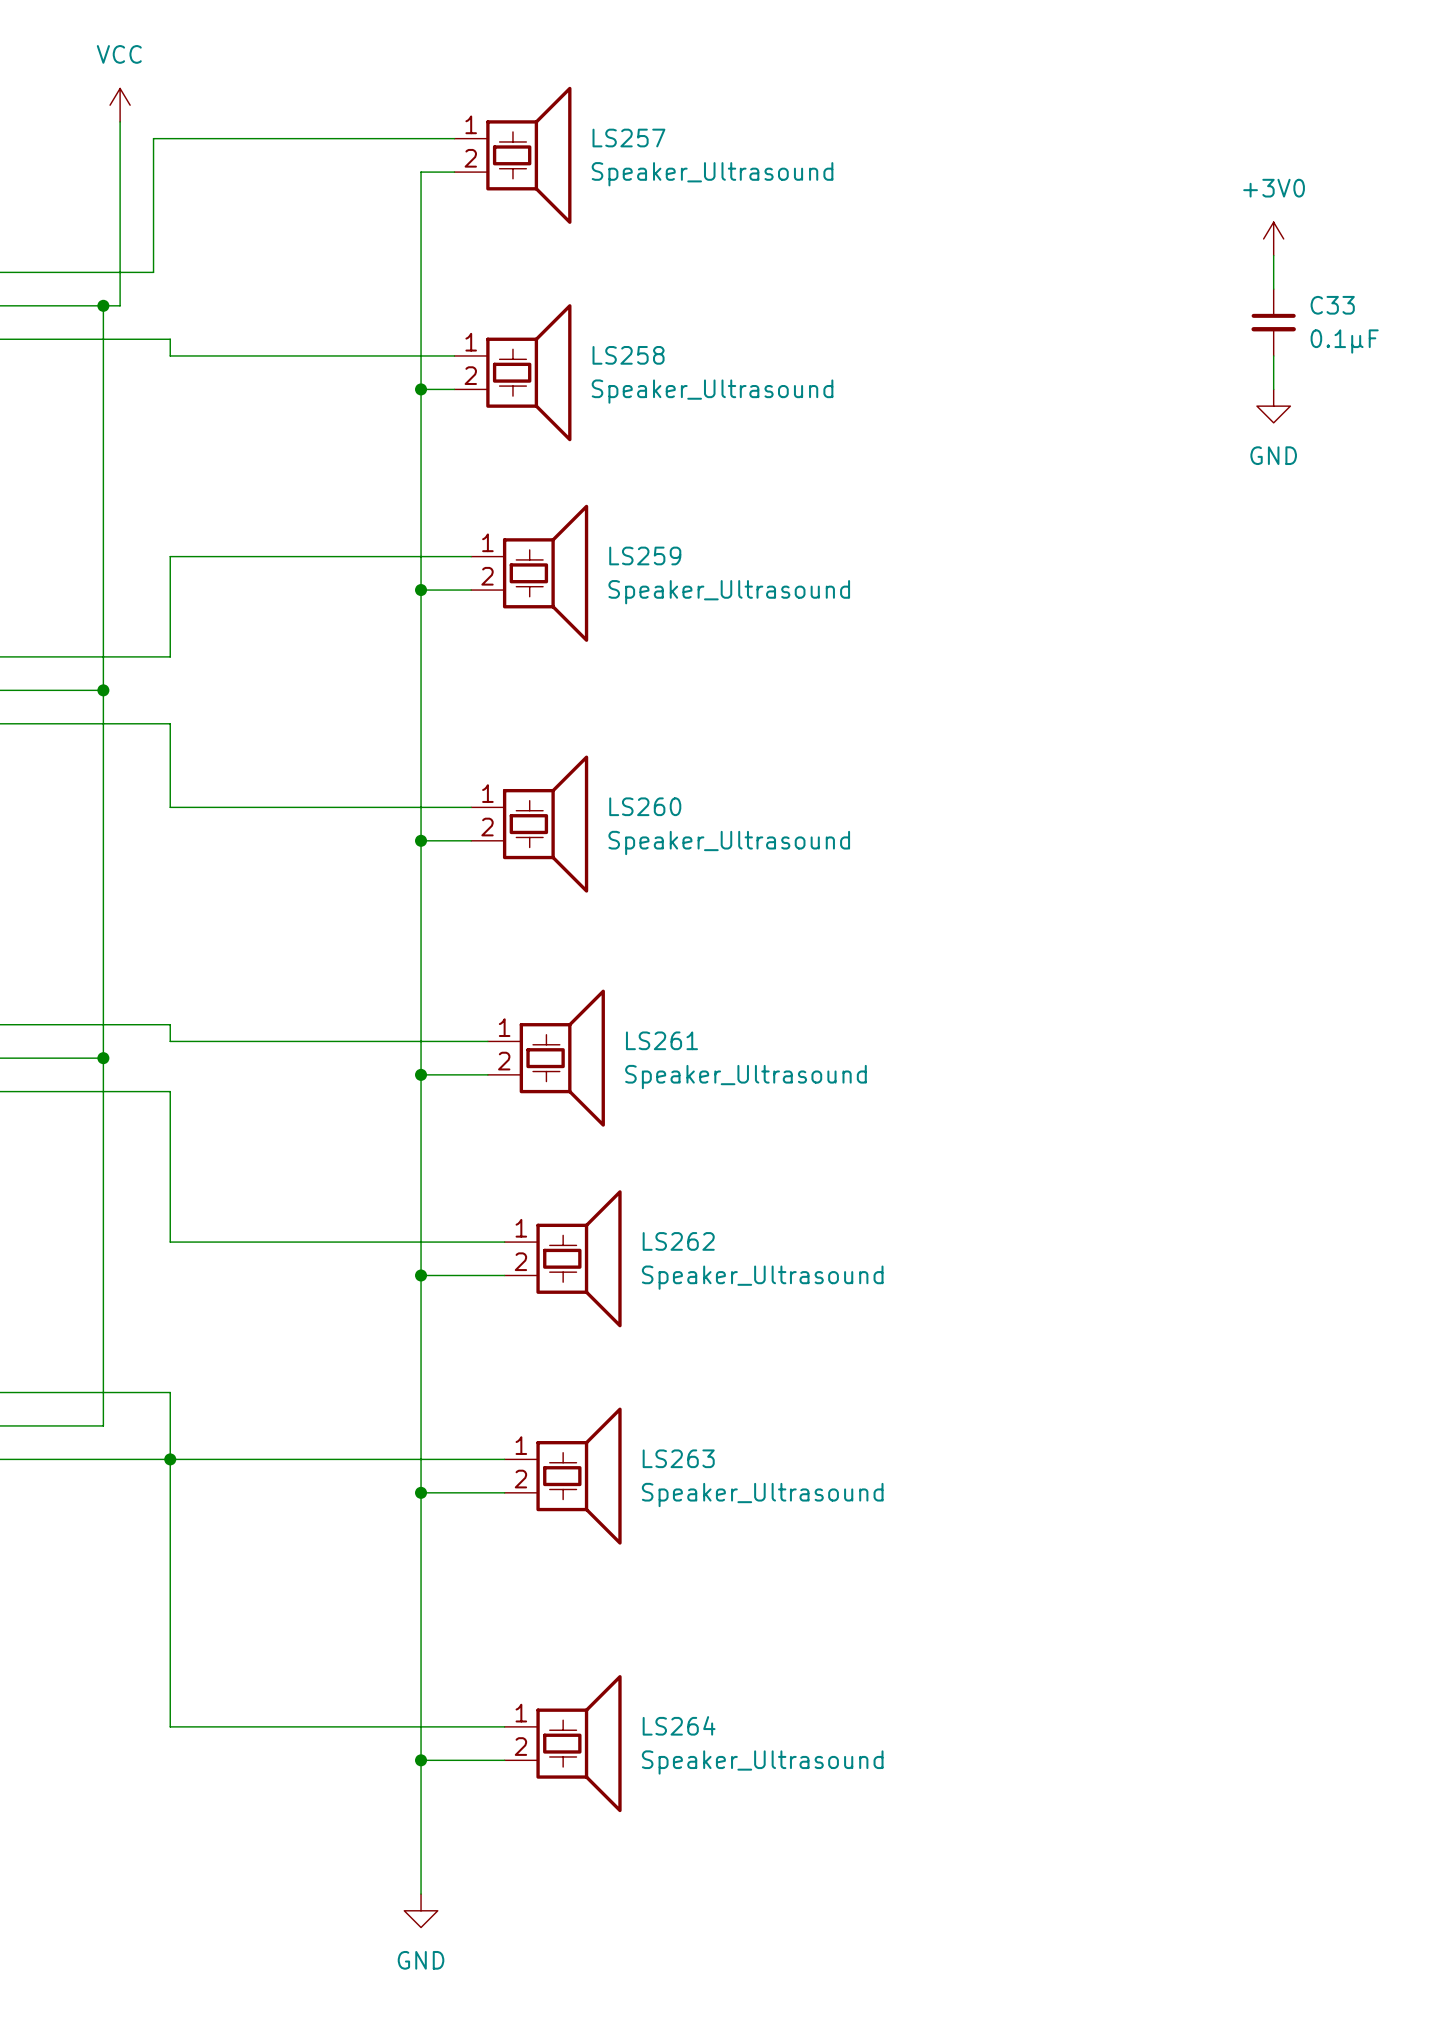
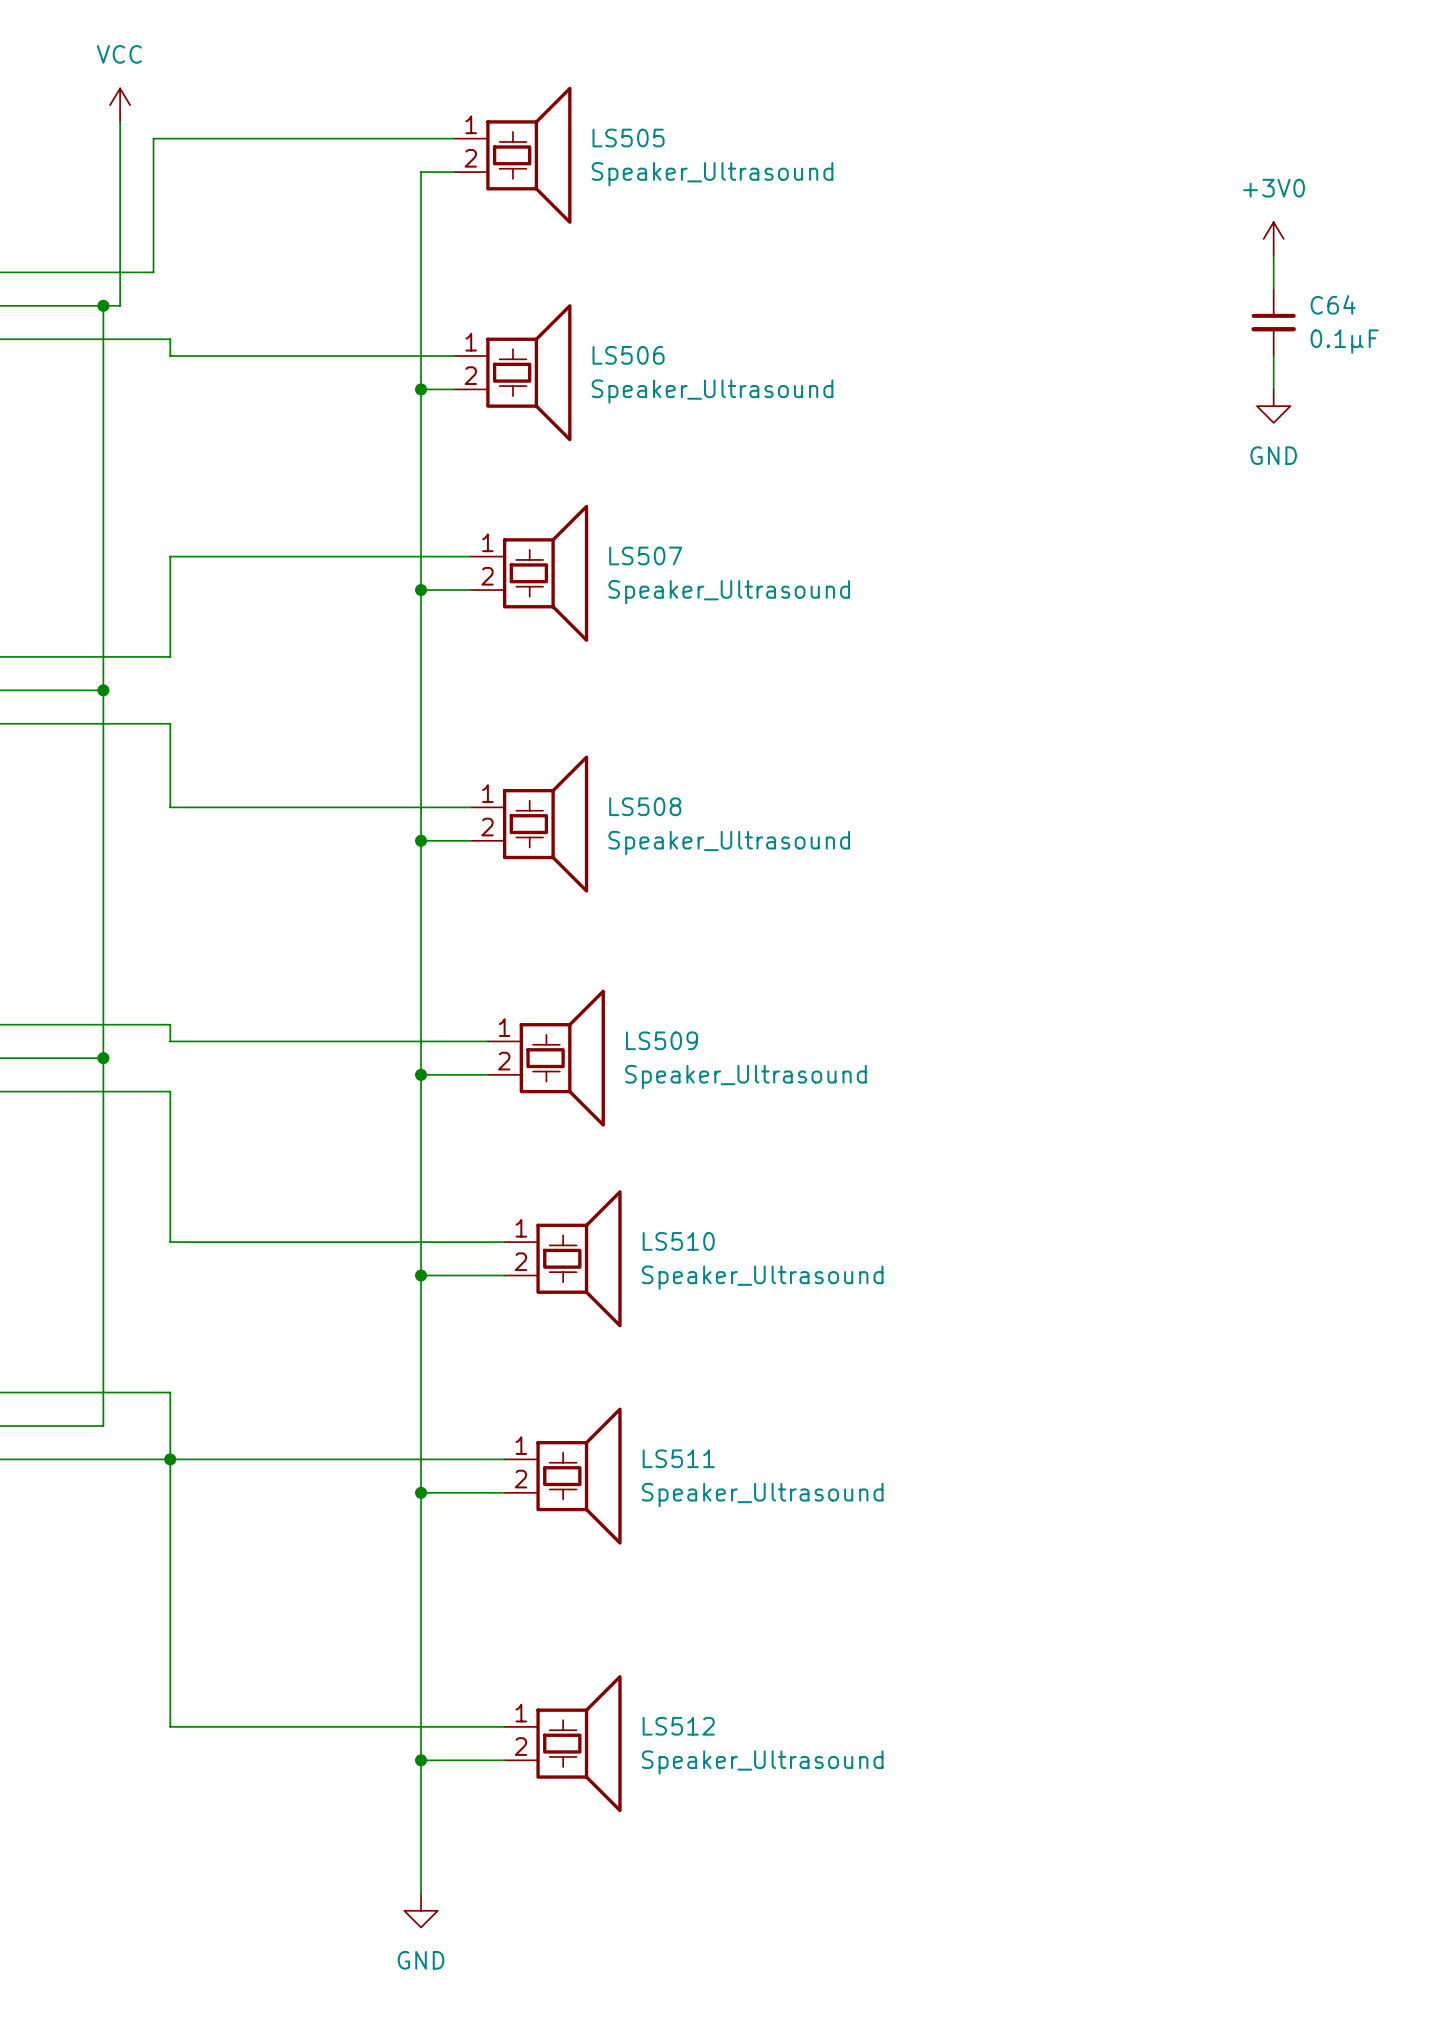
LS257 name: LS257 (628, 138) -> LS505 (628, 138)
C33 name: C33 (1332, 305) -> C64 (1333, 304)
LS258 name: LS258 (628, 355) -> LS506 (628, 355)
LS259 name: LS259 (645, 555) -> LS507 (645, 555)
LS260 name: LS260 (645, 806) -> LS508 (645, 806)
LS261 name: LS261 (661, 1040) -> LS509 (661, 1040)
LS262 name: LS262 (678, 1241) -> LS510 (678, 1241)
LS263 name: LS263 (678, 1458) -> LS511 (678, 1458)
LS264 name: LS264 (679, 1725) -> LS512 (678, 1726)

